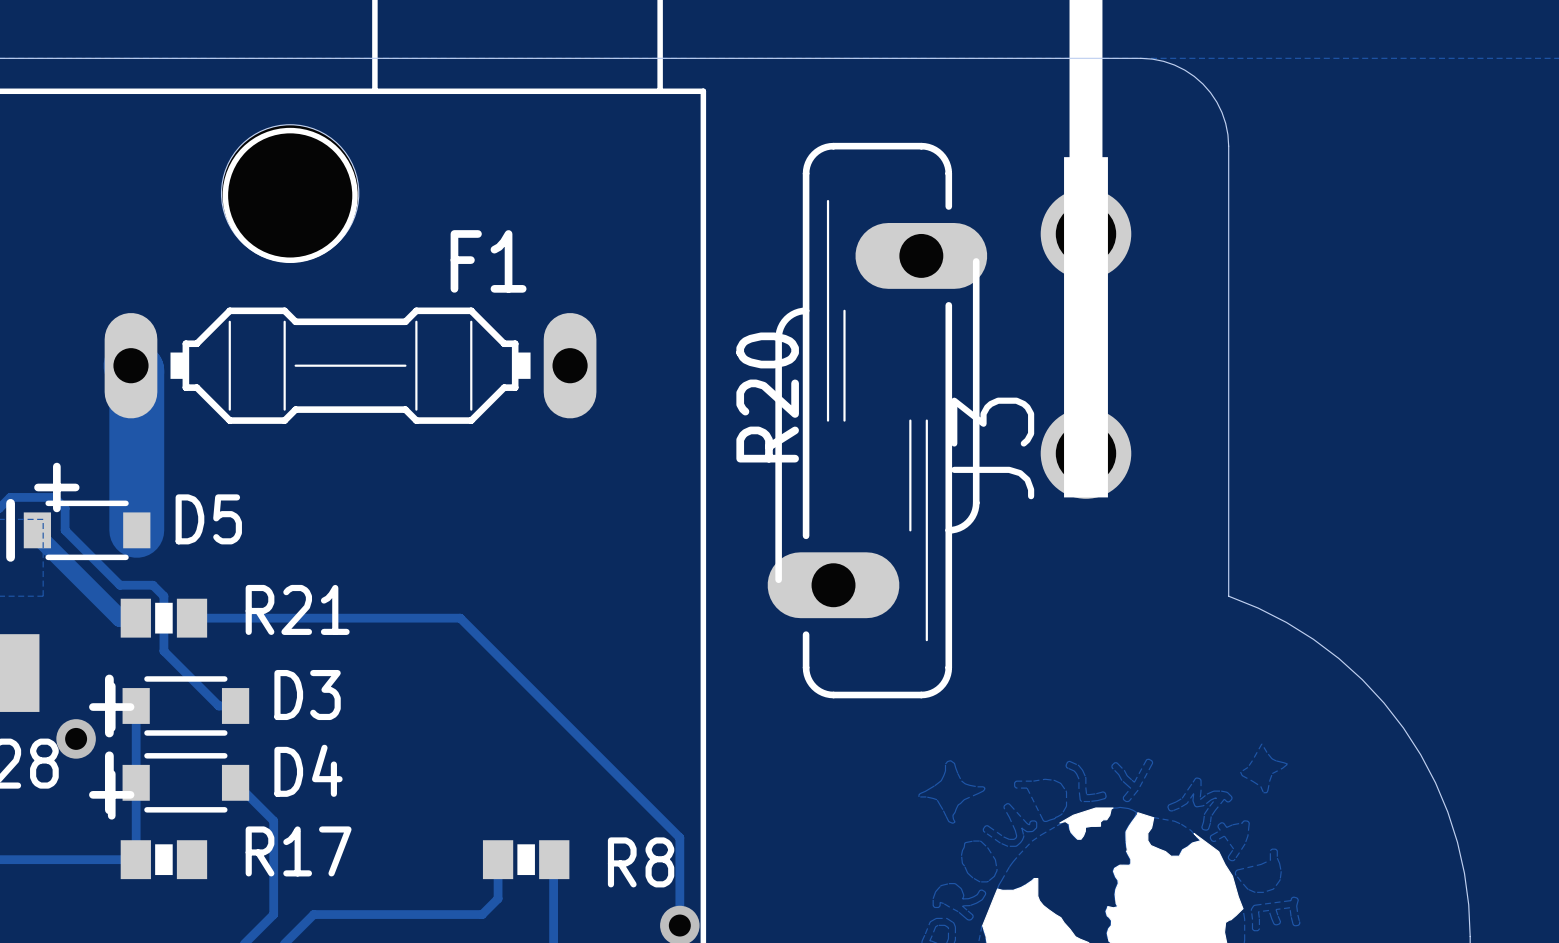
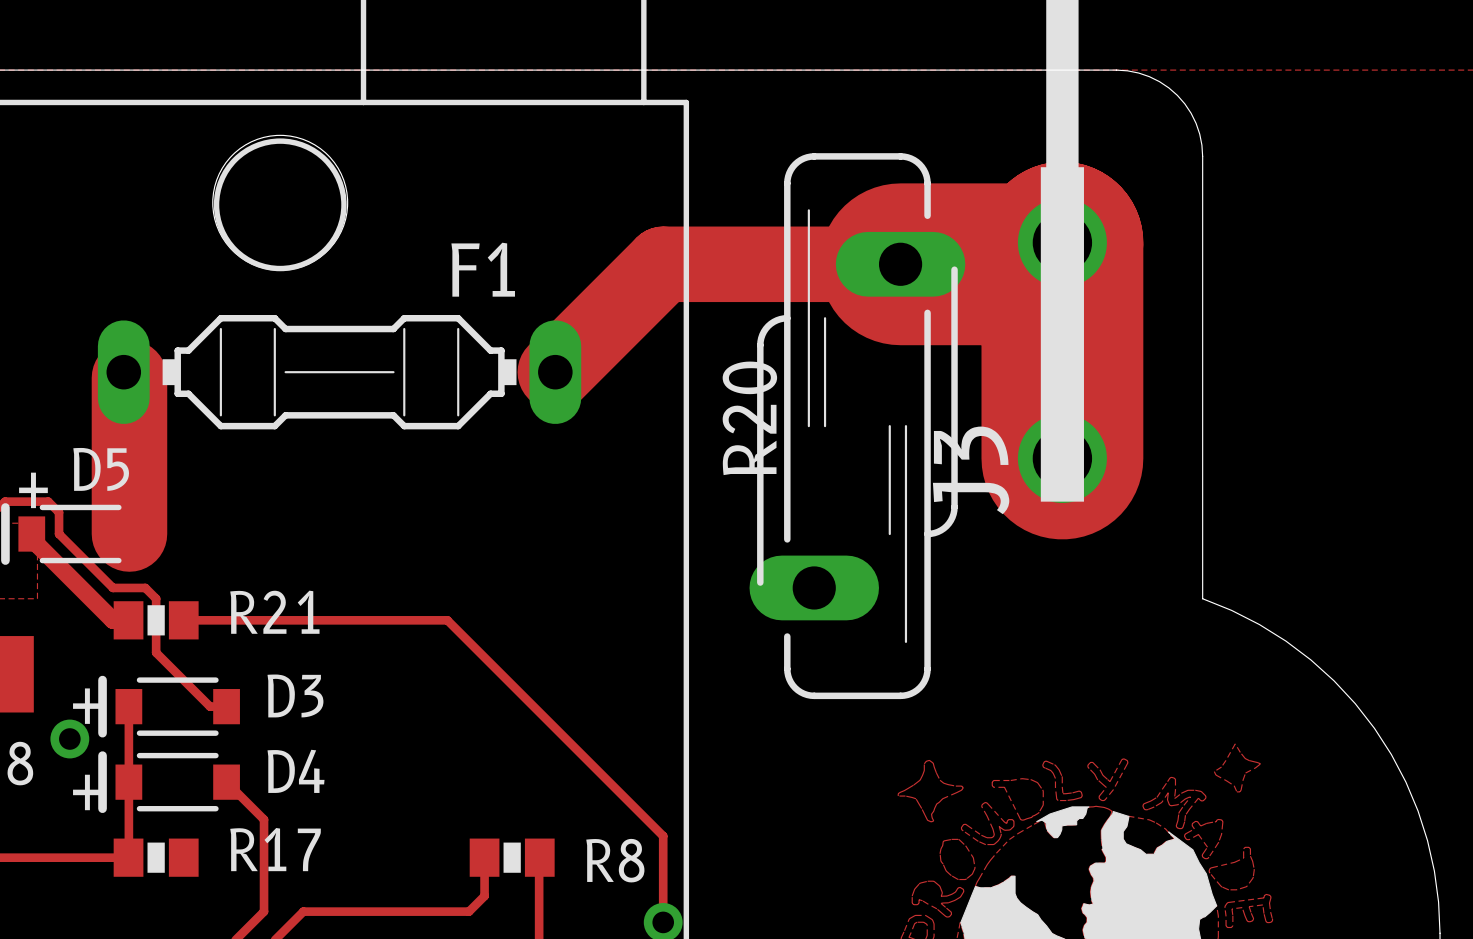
track: none -> (555, 372) (663, 264) (1040, 264) (1062, 242) (1062, 458)
track width: thin (136, 370) (136, 530) -> thick (129, 377) (129, 534)
D5 name position: D5 (208, 519) -> D5 (101, 469)

